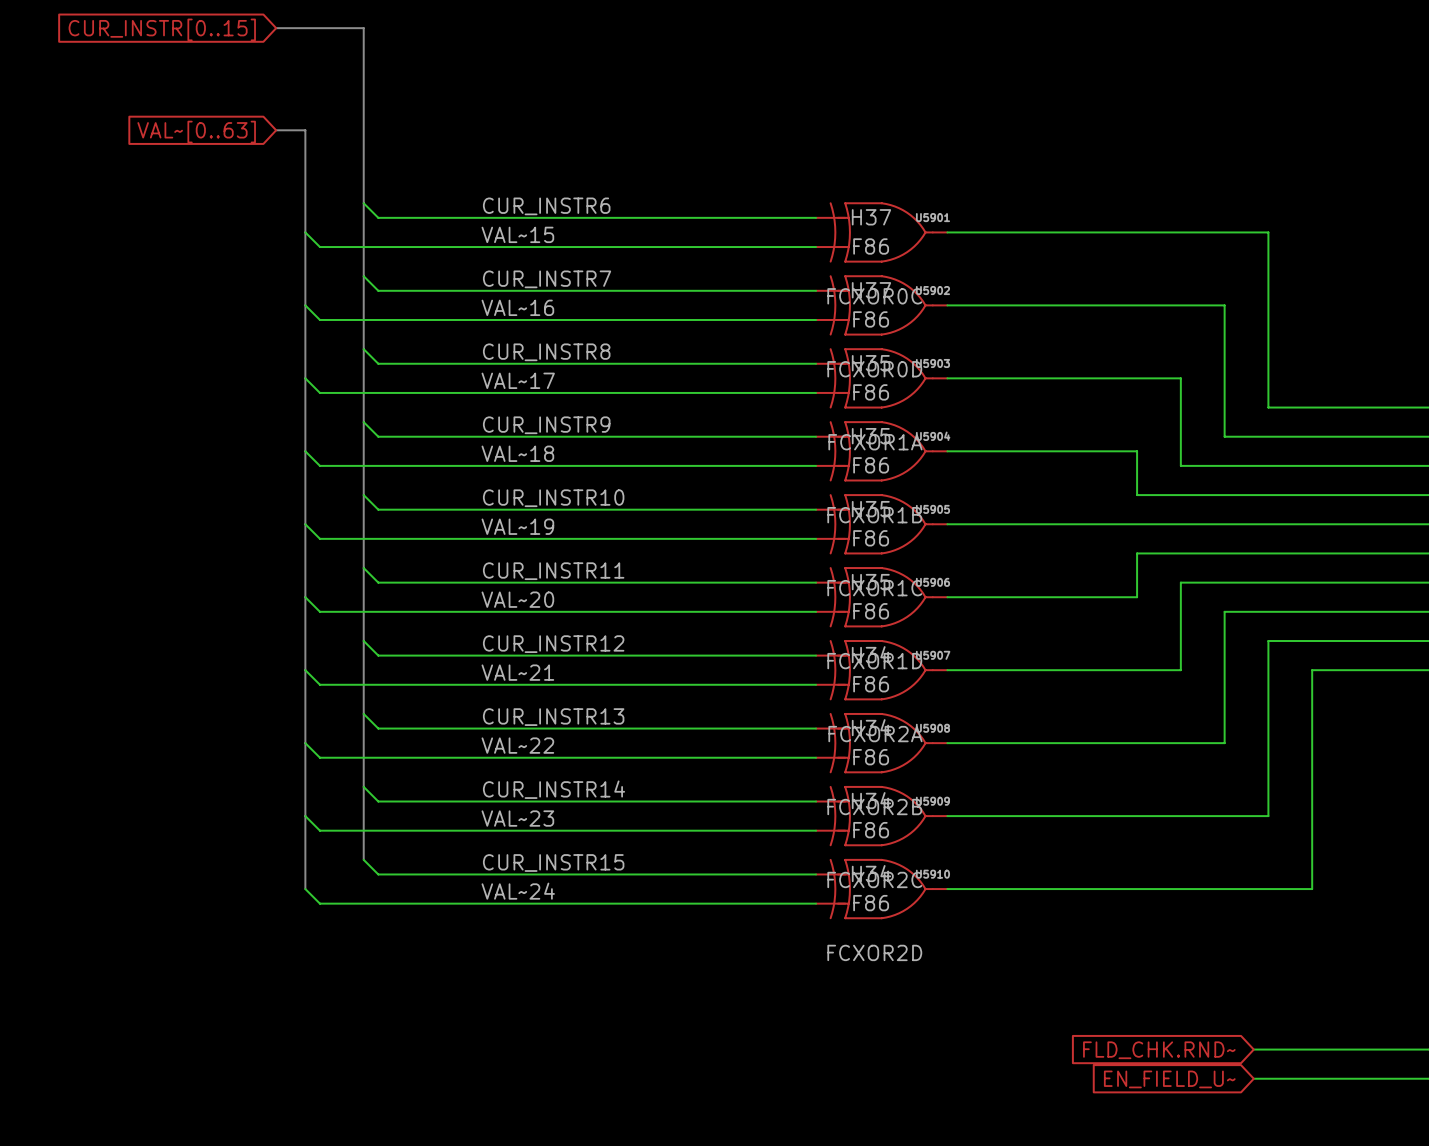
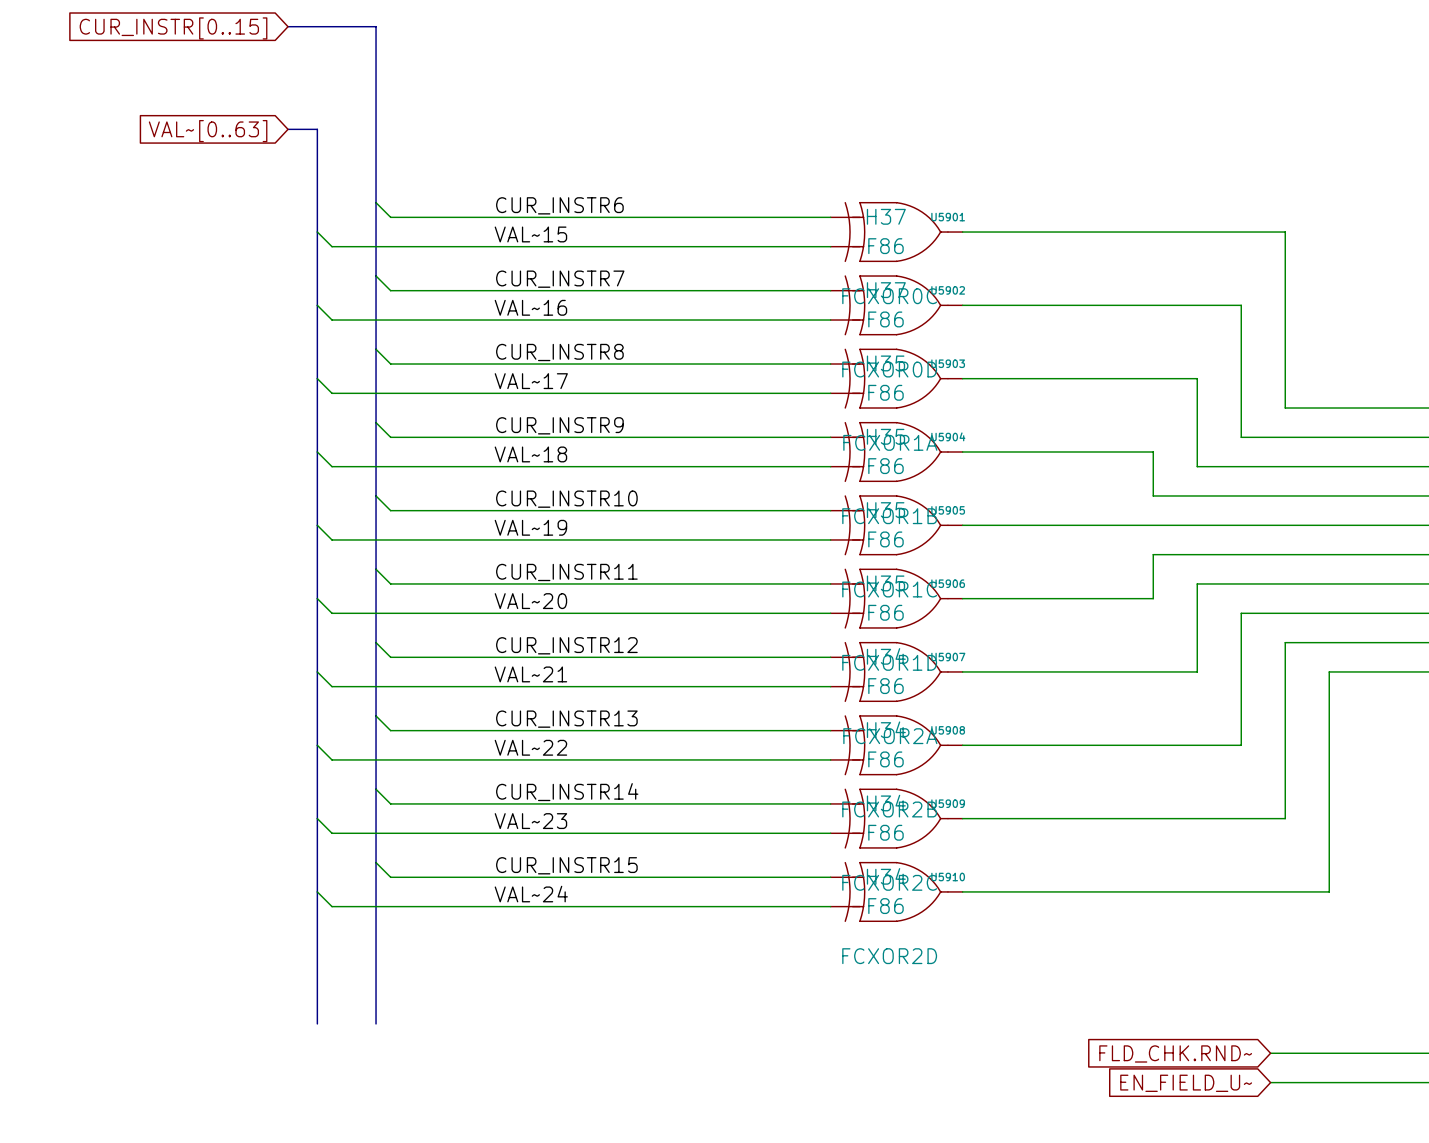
bus: none -> (376, 862) (376, 1023)
bus: none -> (317, 891) (317, 1023)

